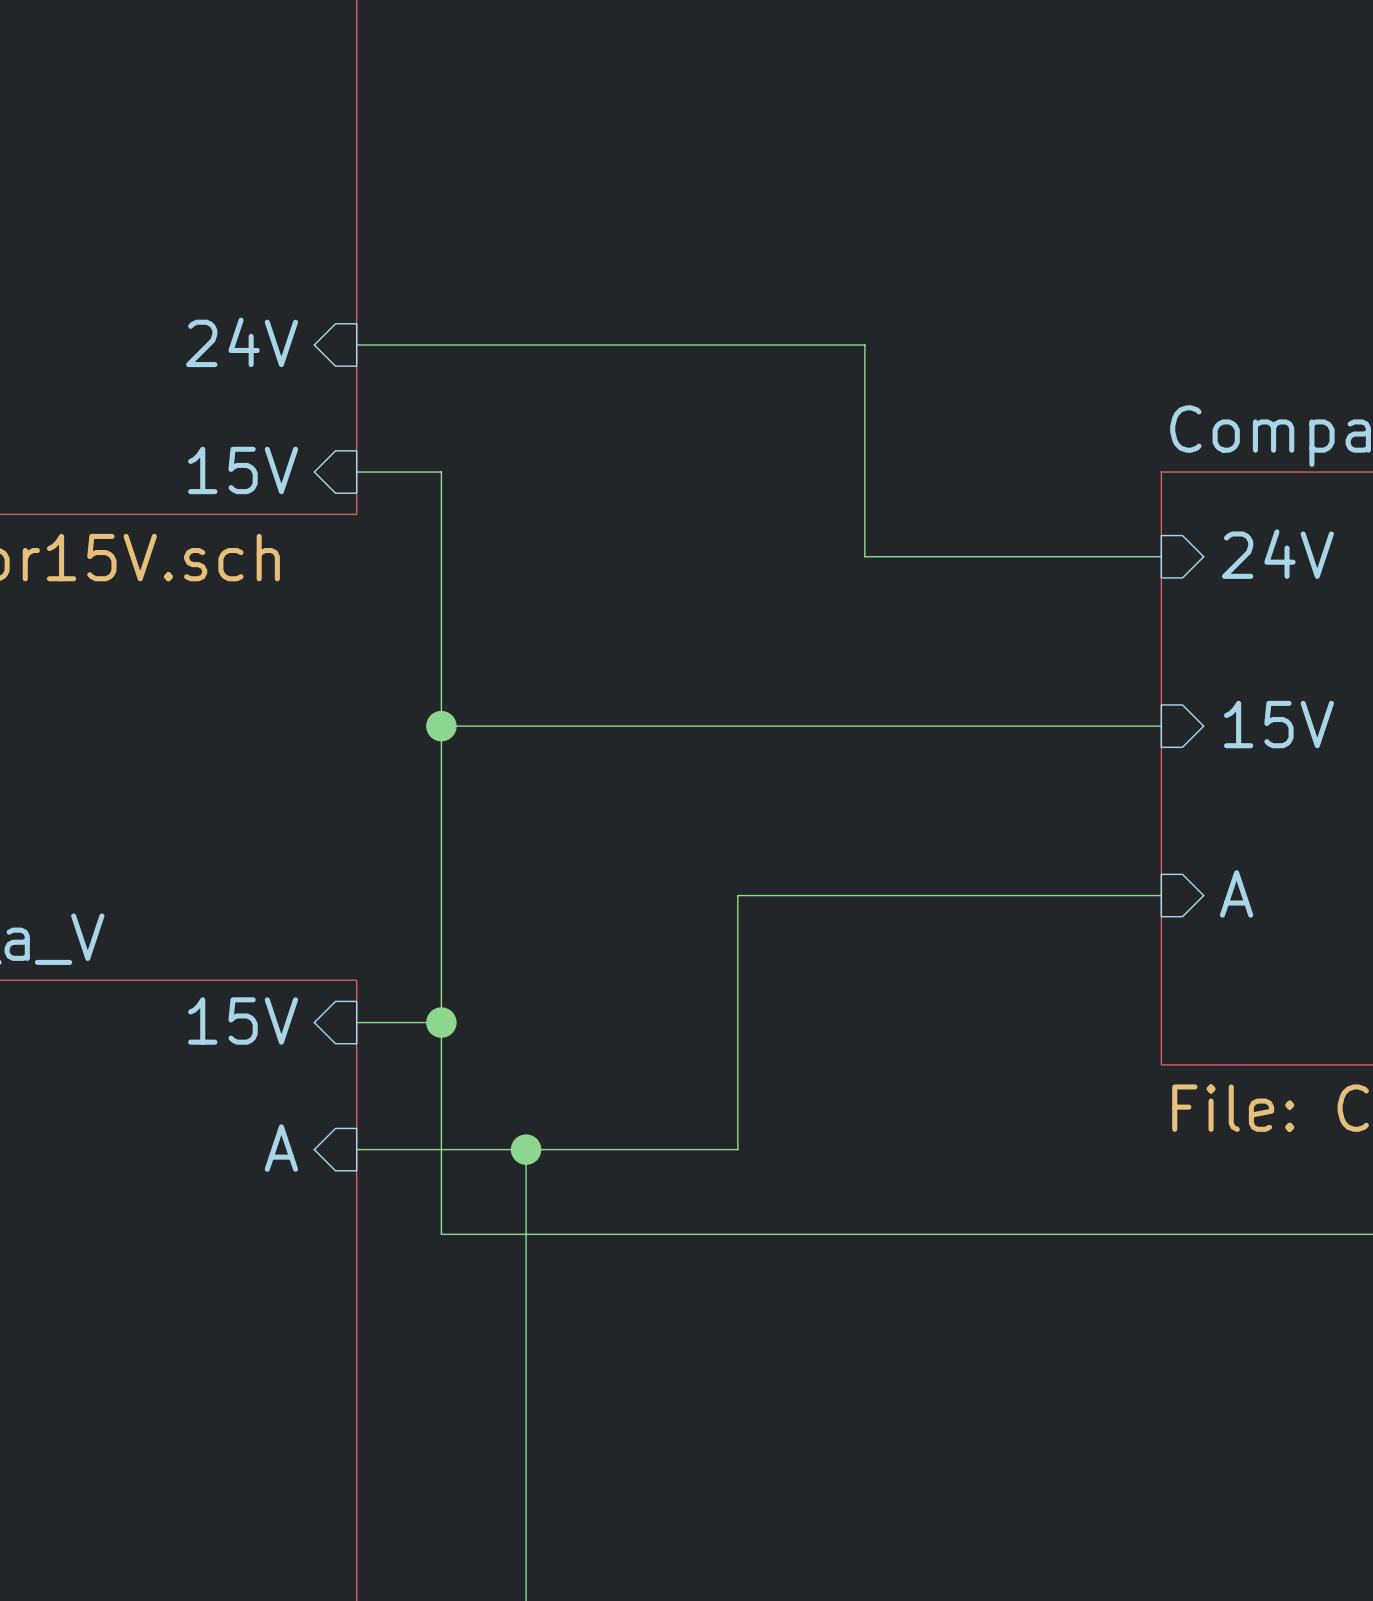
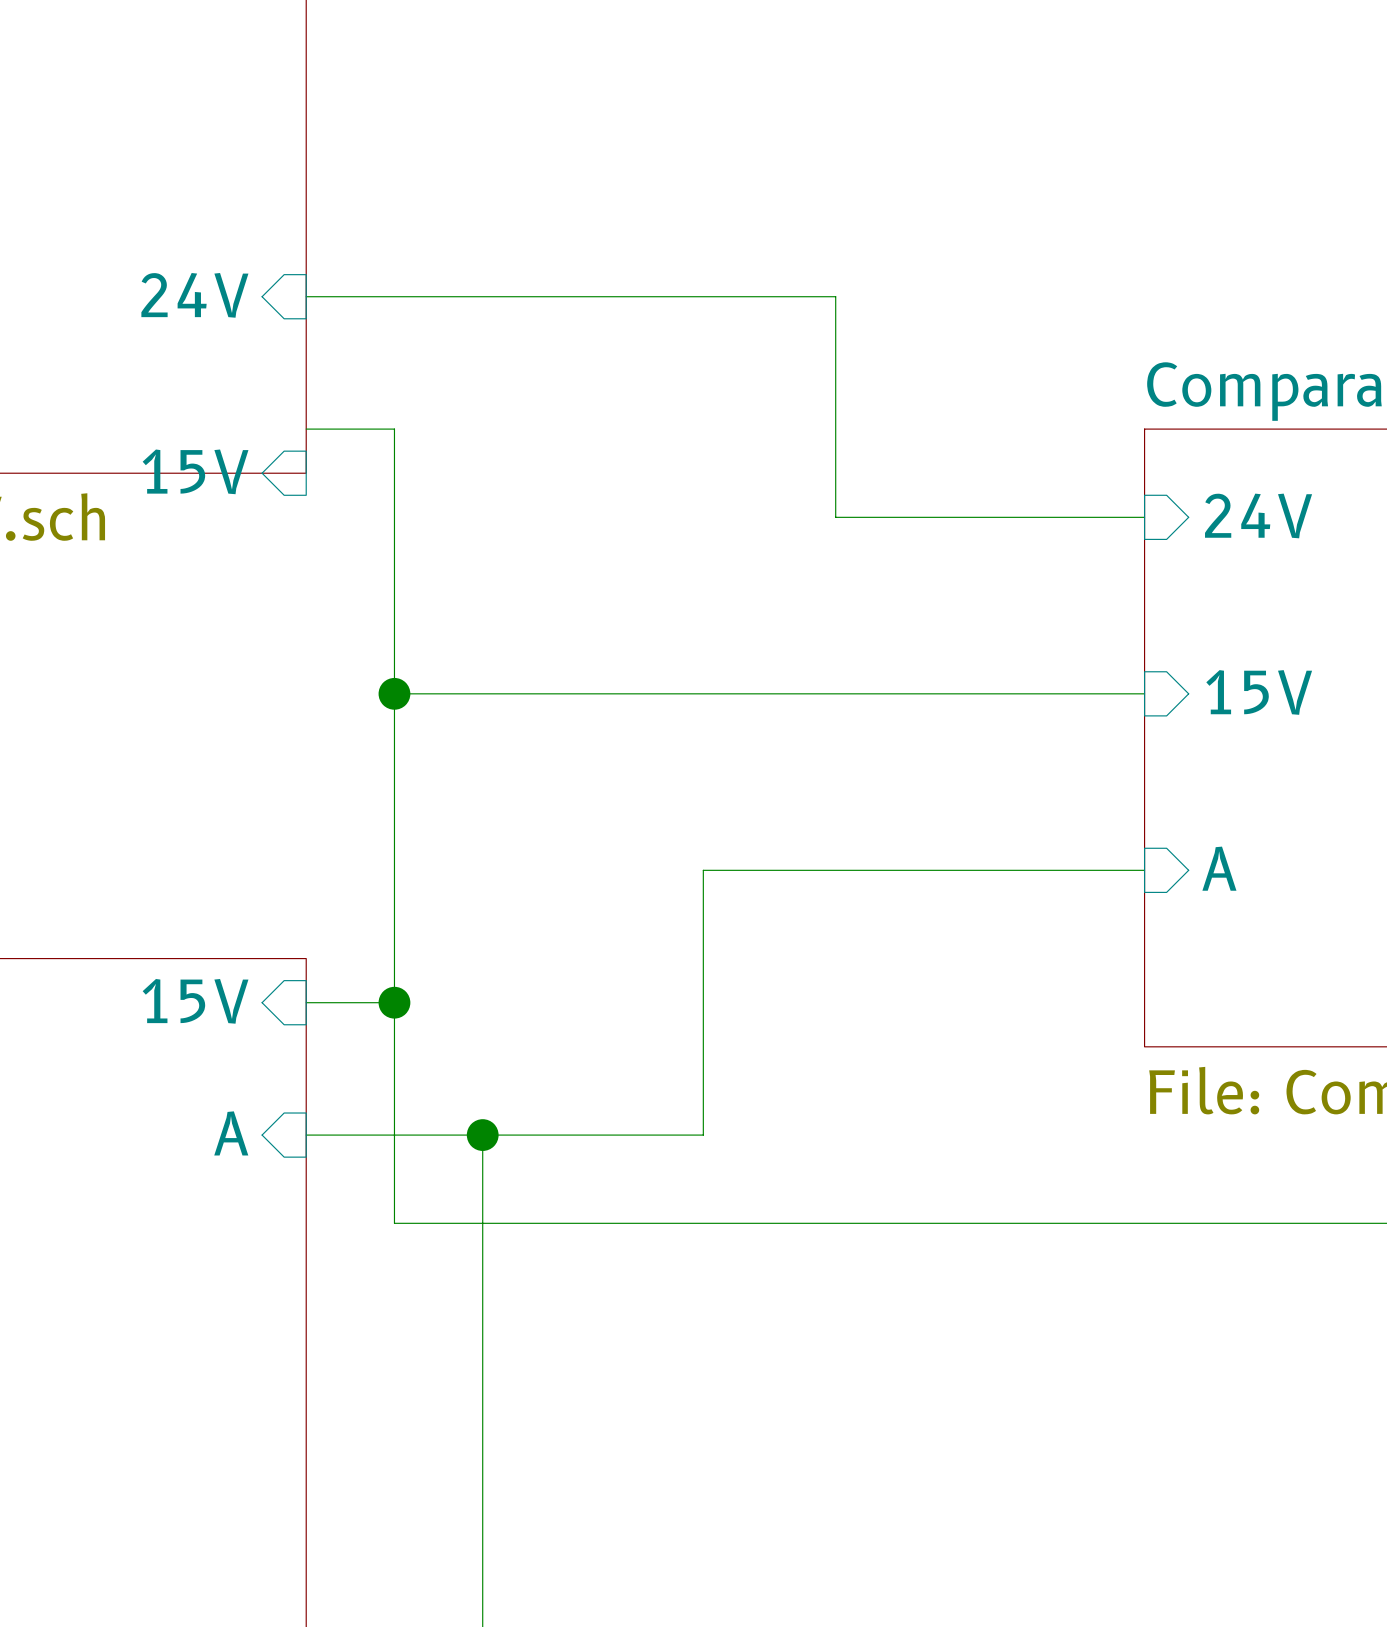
sheet pin position: 15V (243, 470) -> 15V (195, 471)

